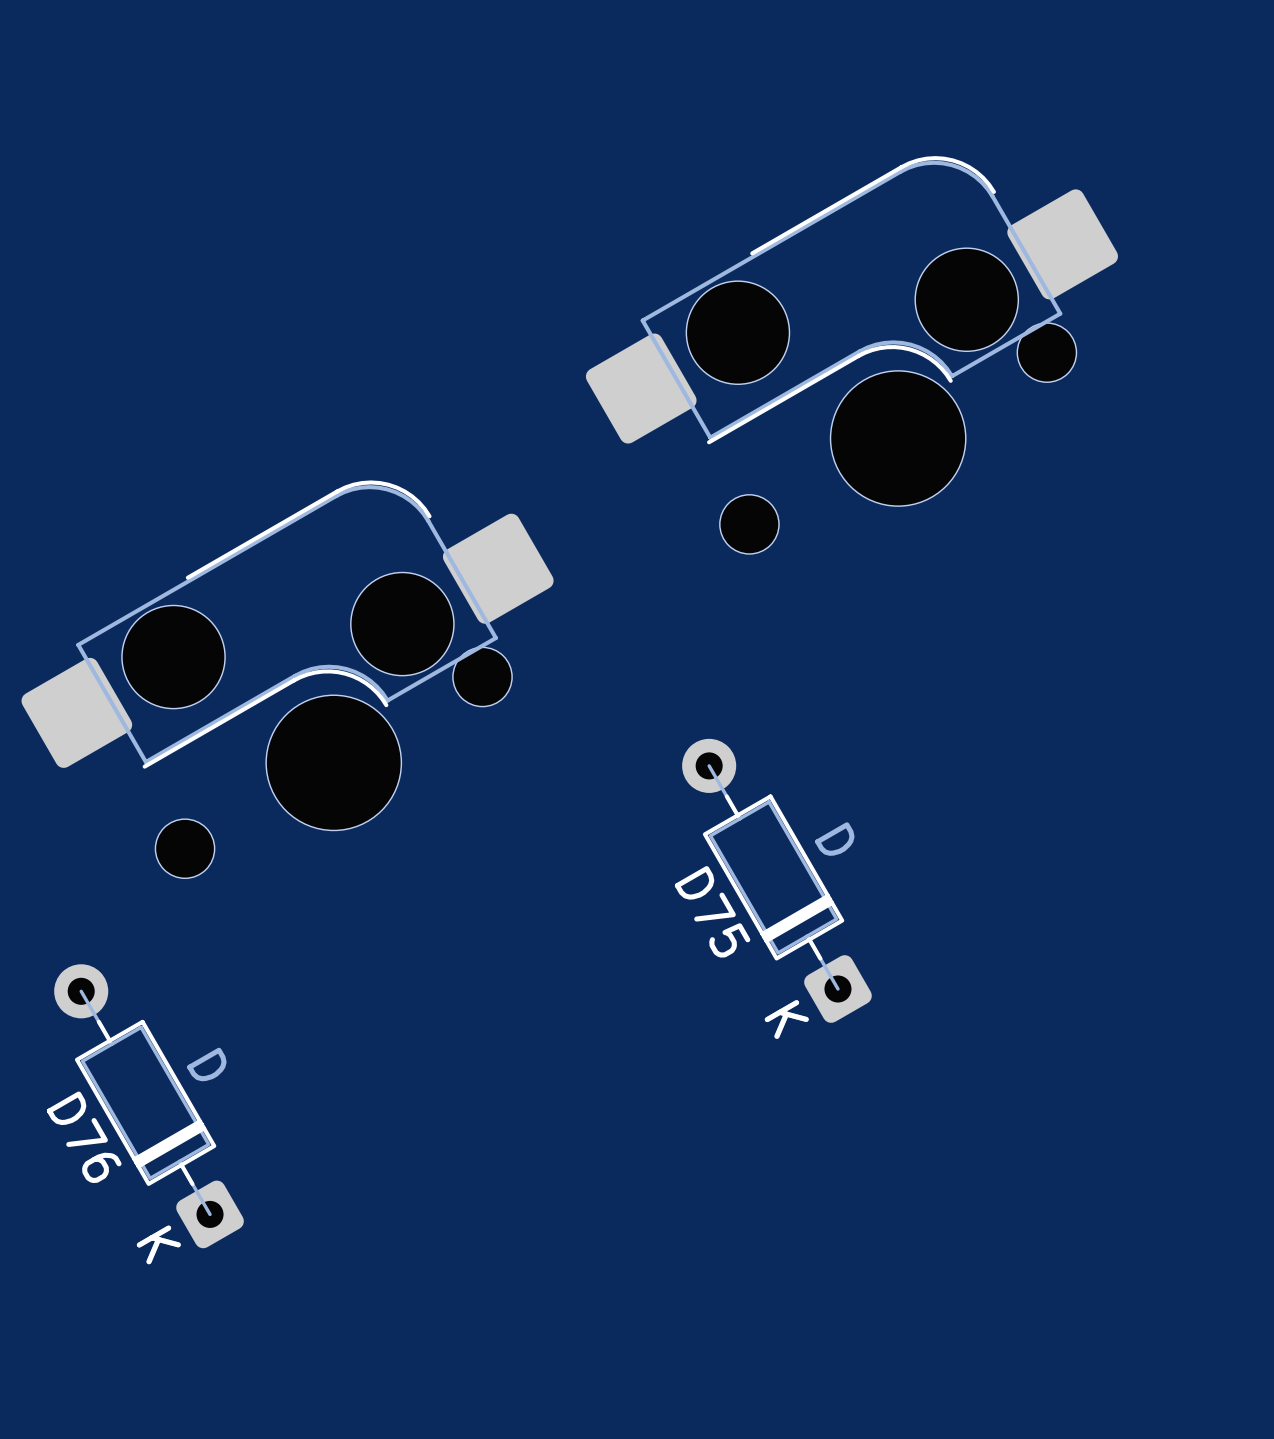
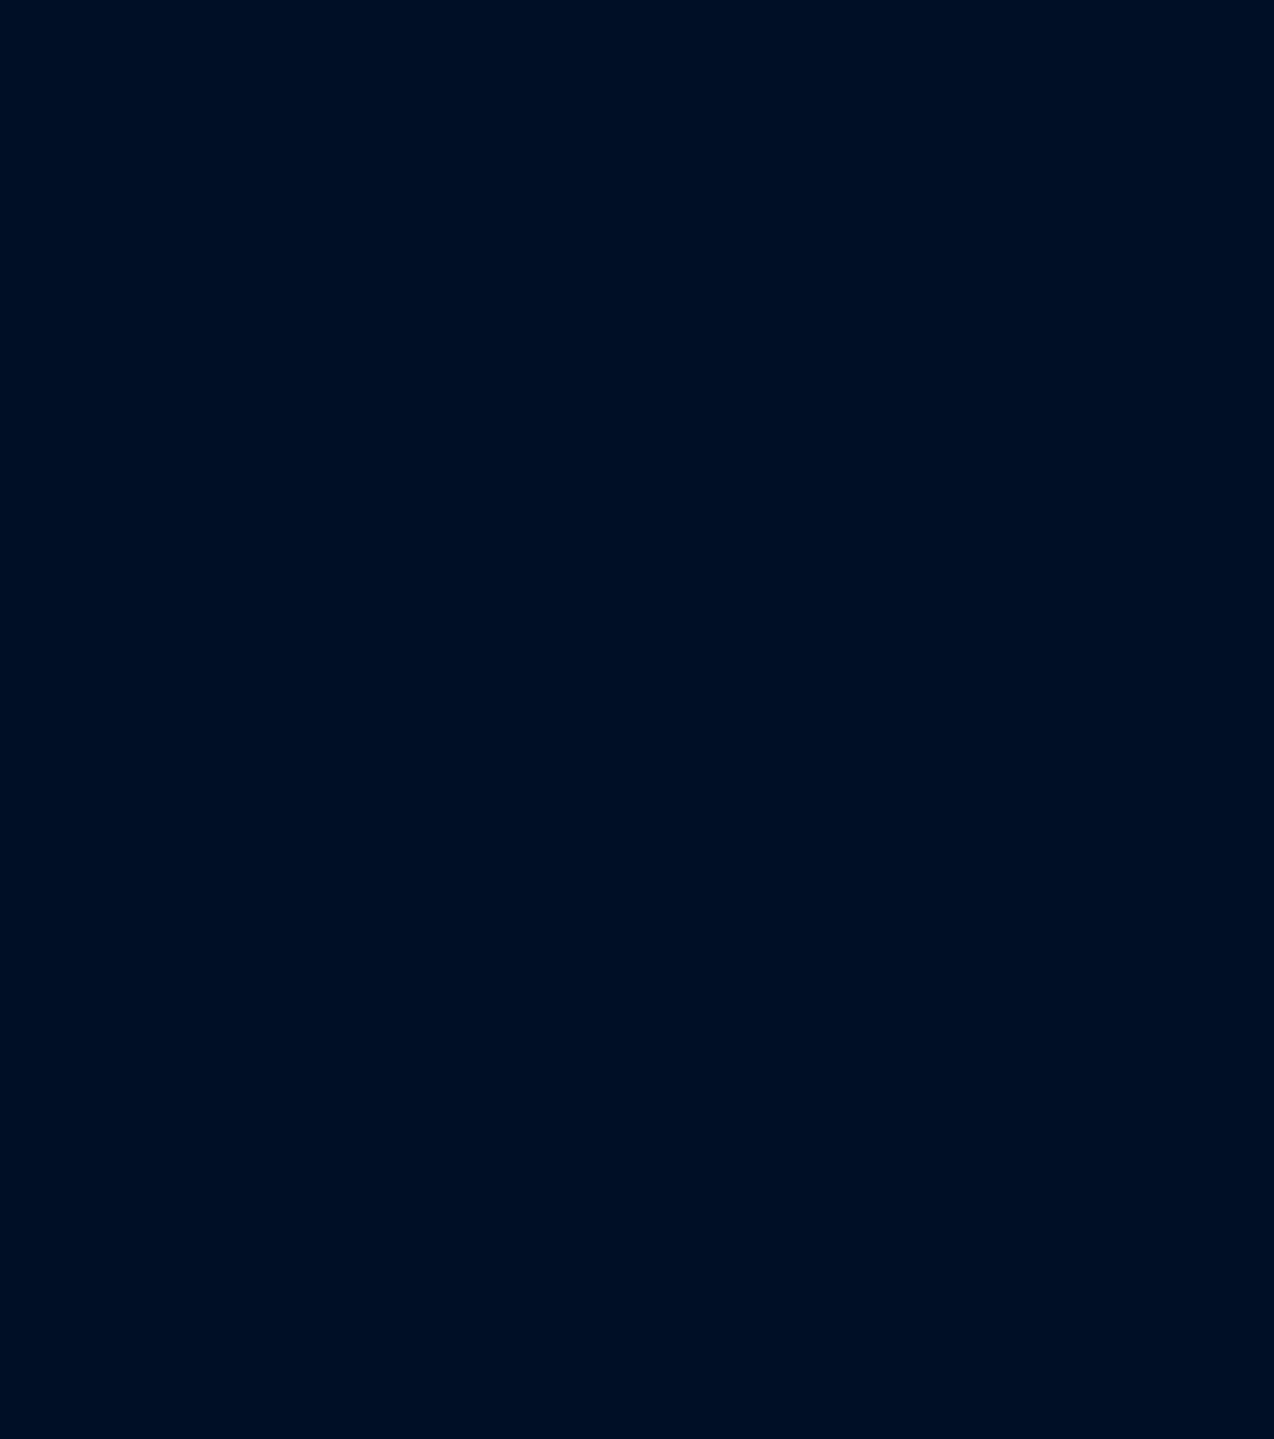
part: (851, 355) -> none
part: (287, 679) -> none
D75: D (776, 880) -> none
D76: D (149, 1106) -> none

